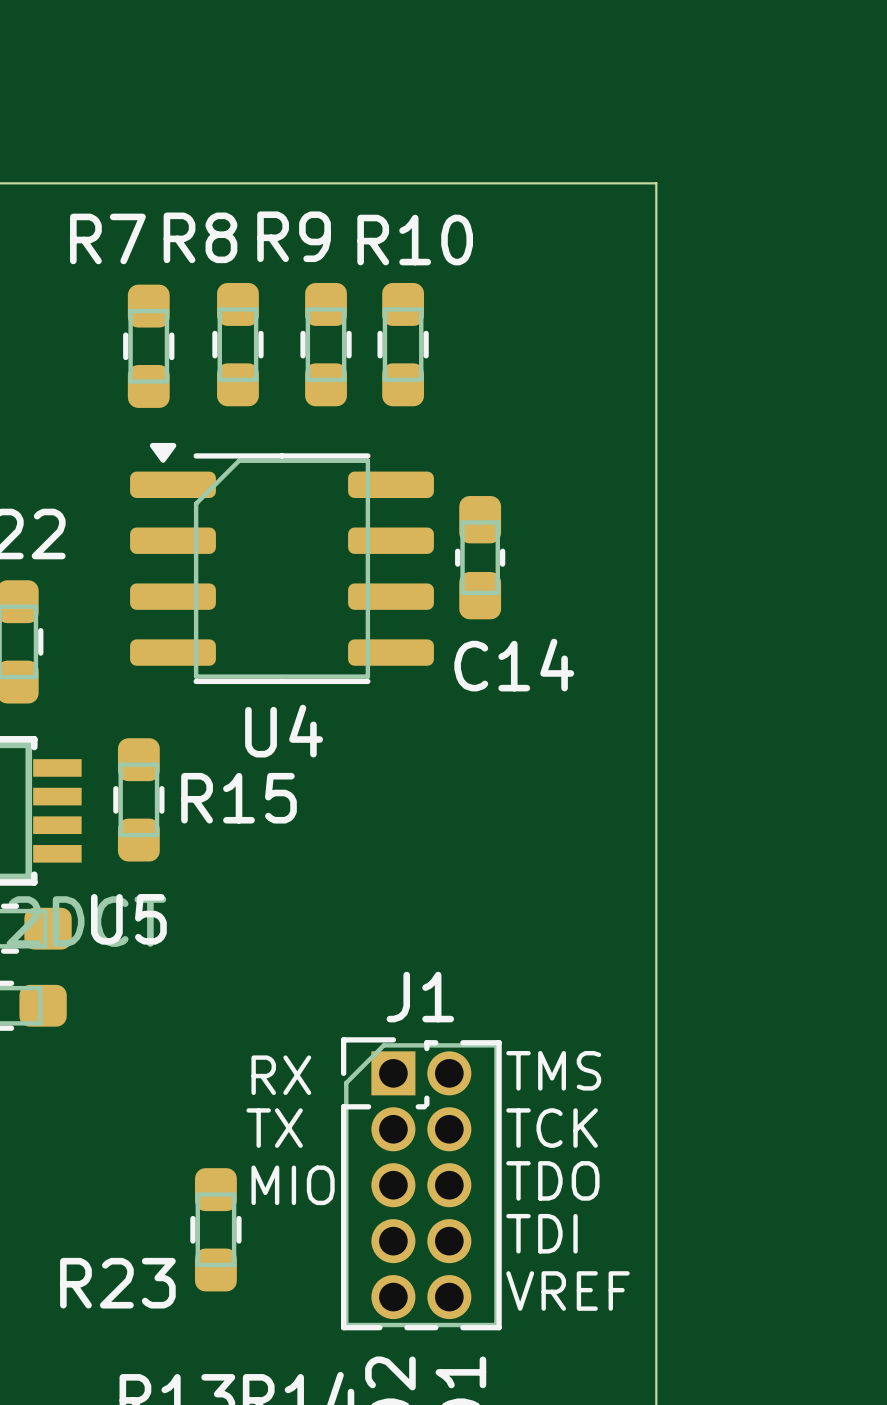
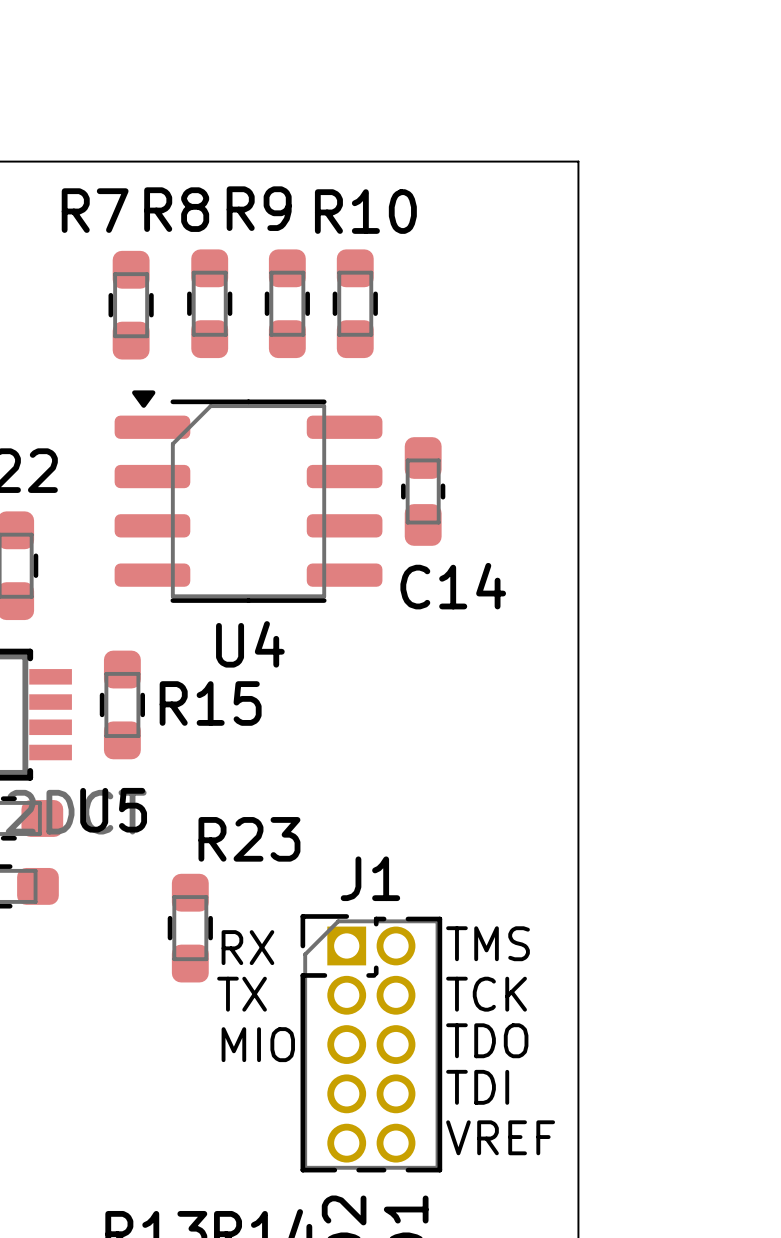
R23 position: (215, 1229) -> (190, 928)
R23 name position: R23 (117, 1283) -> R23 (249, 839)

